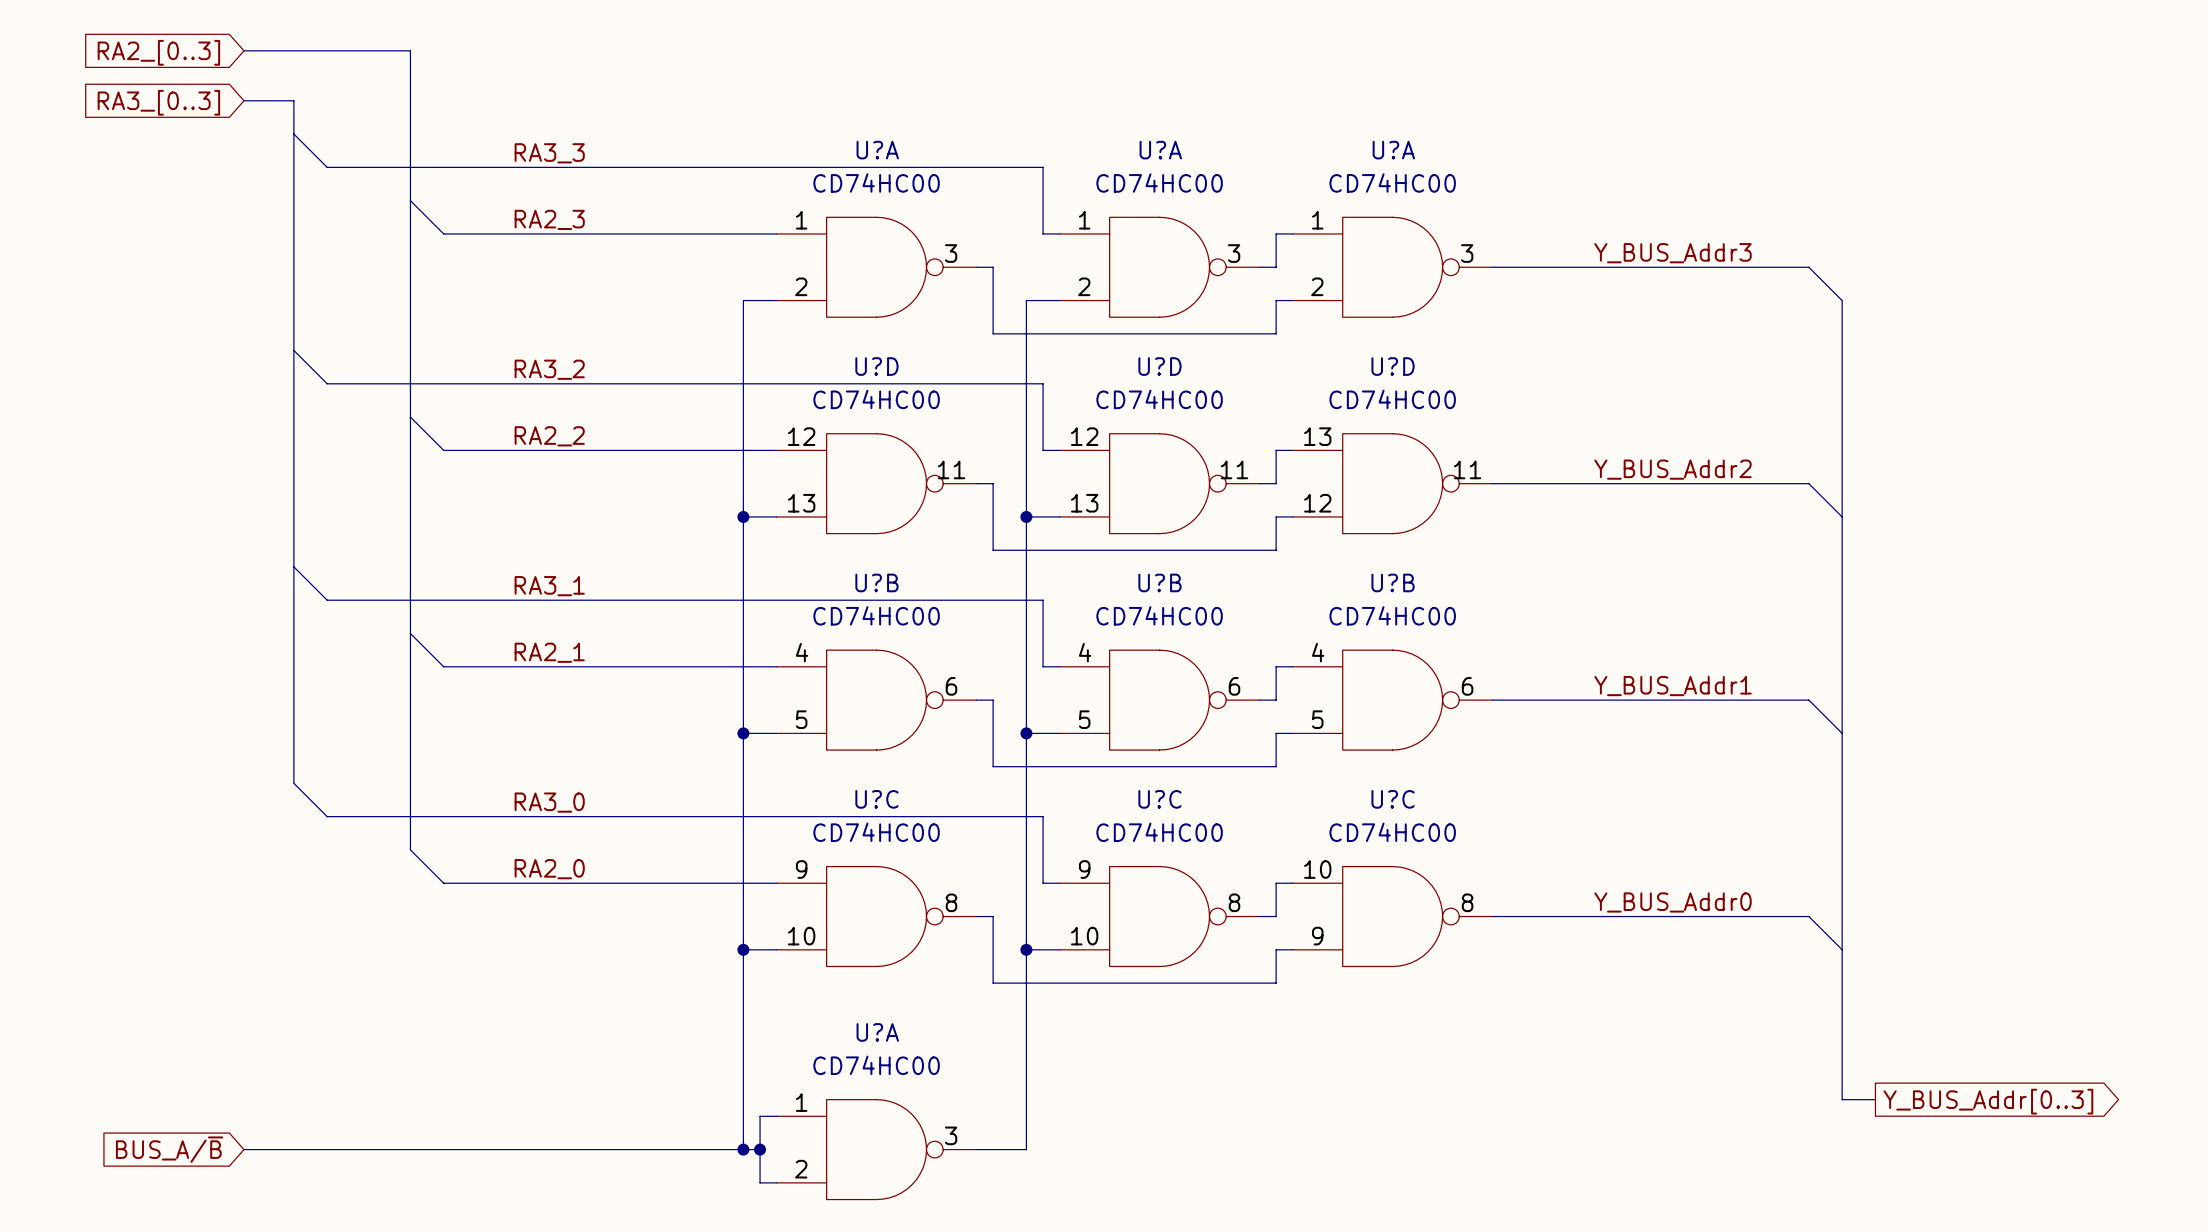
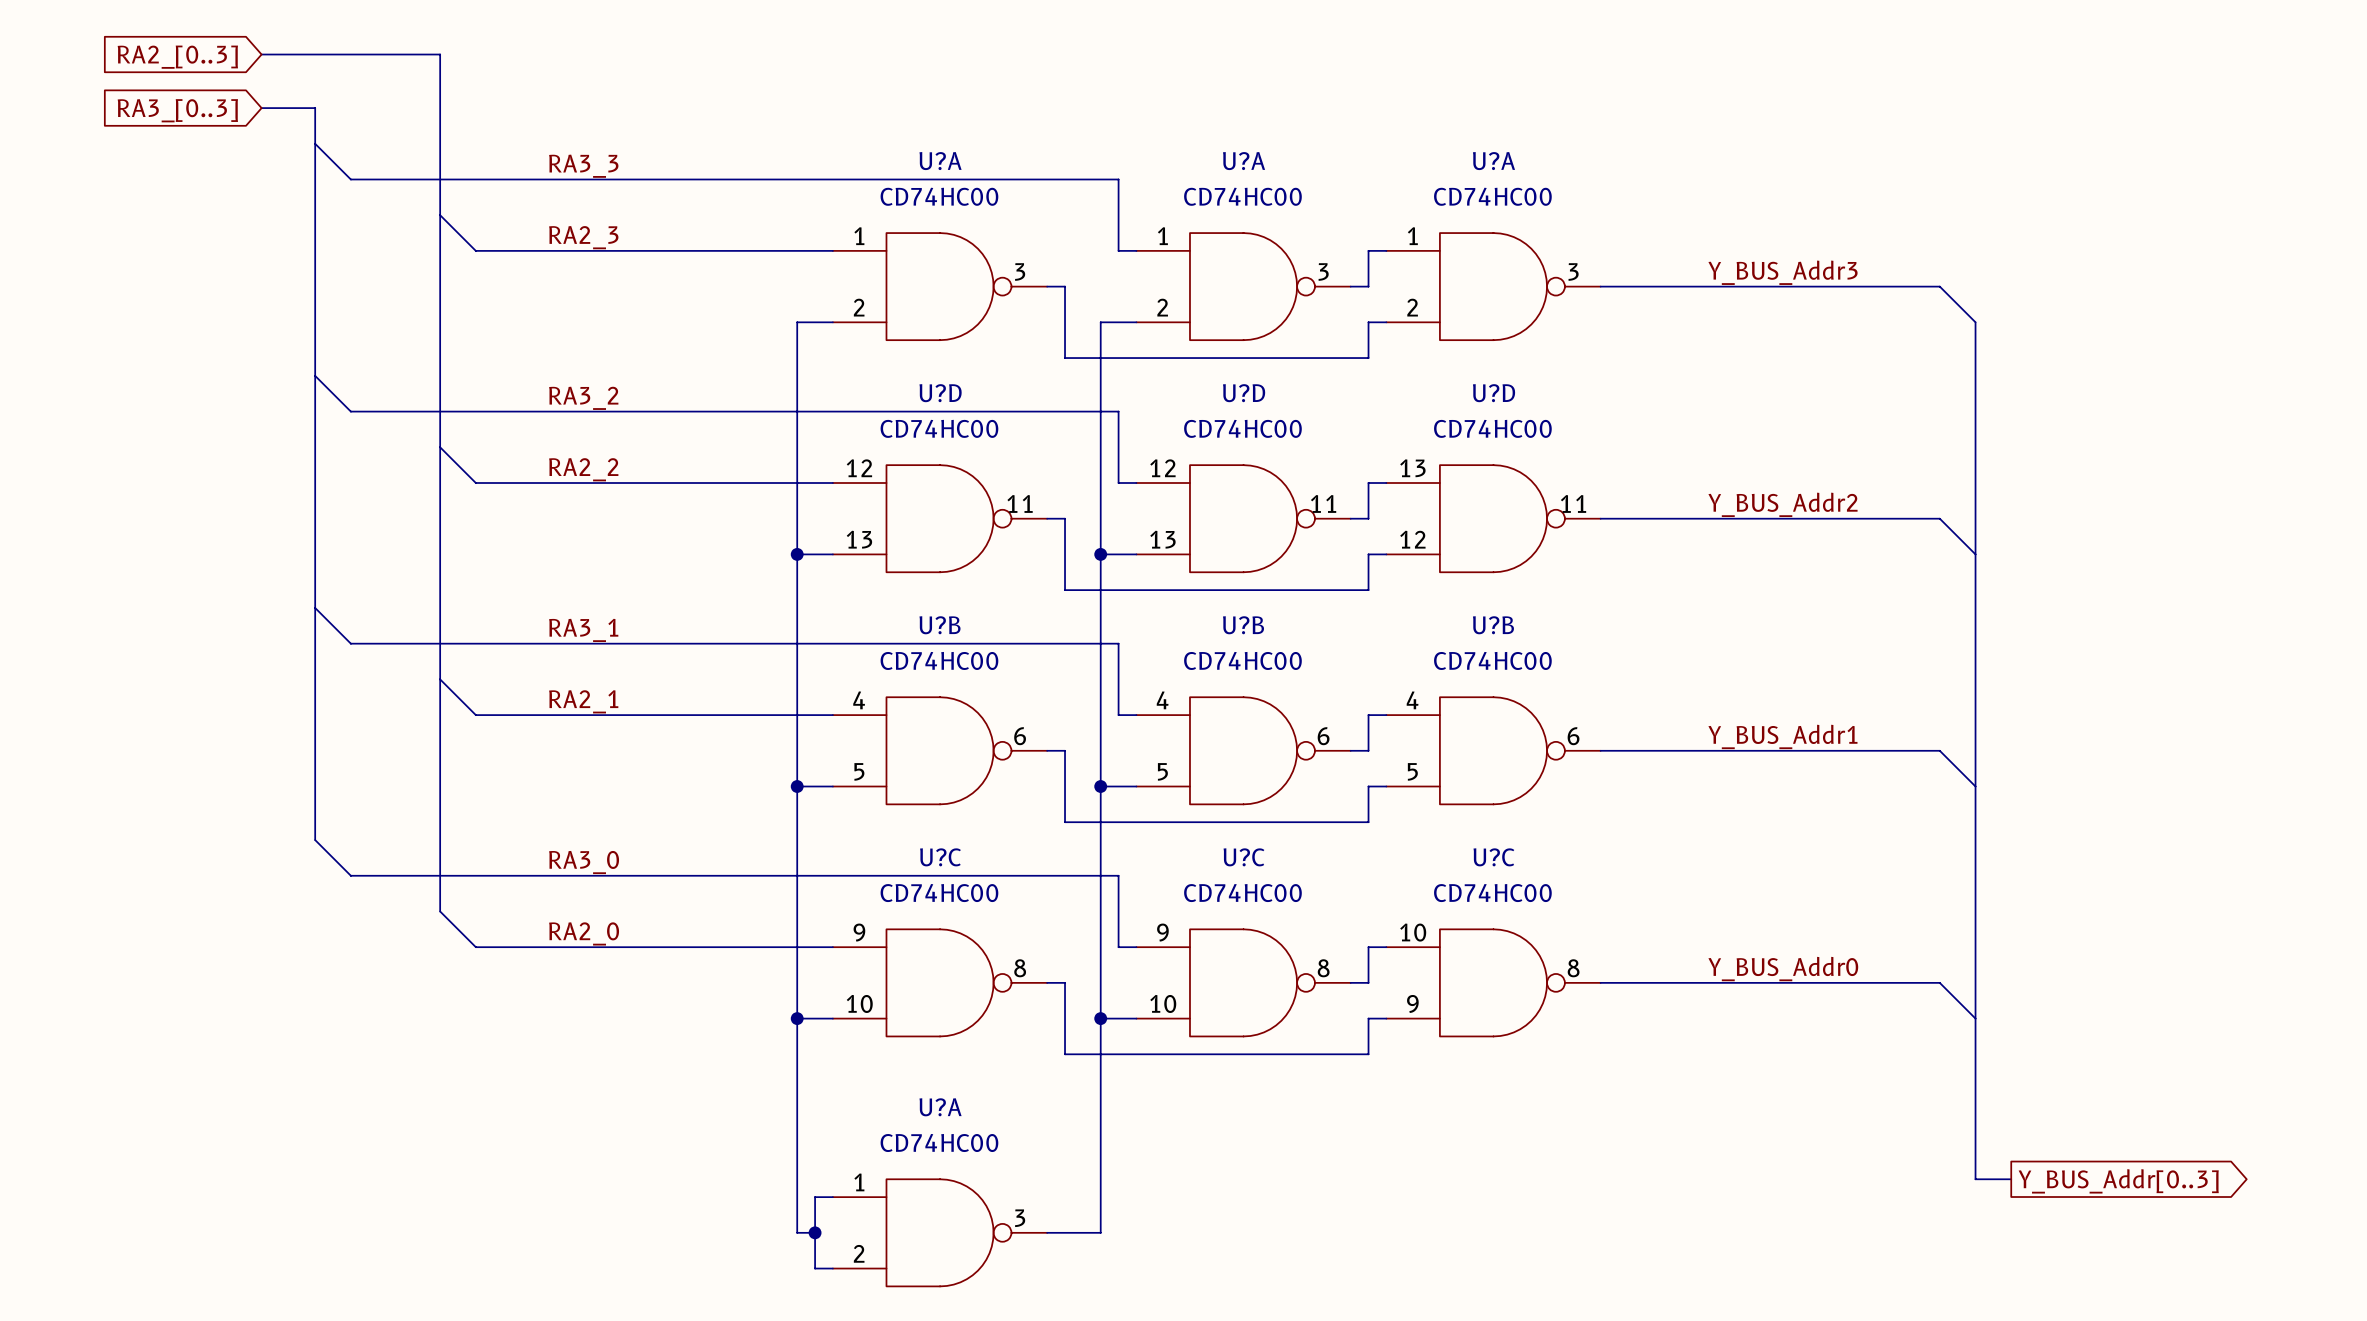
global label: BUS_A/~{B} (169, 1149) -> none
wire: (243, 1149) (743, 1149) -> none
junction: (743, 1149) -> none

